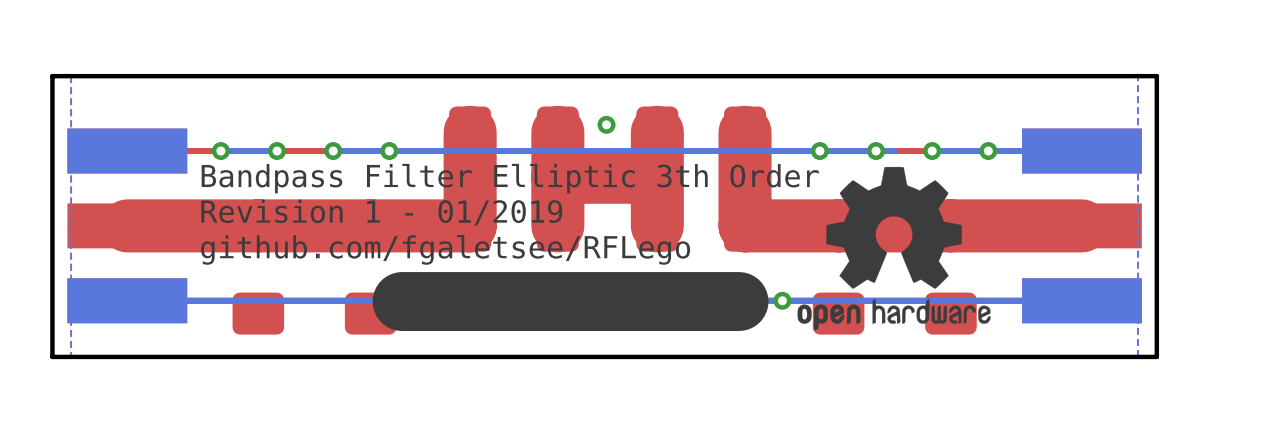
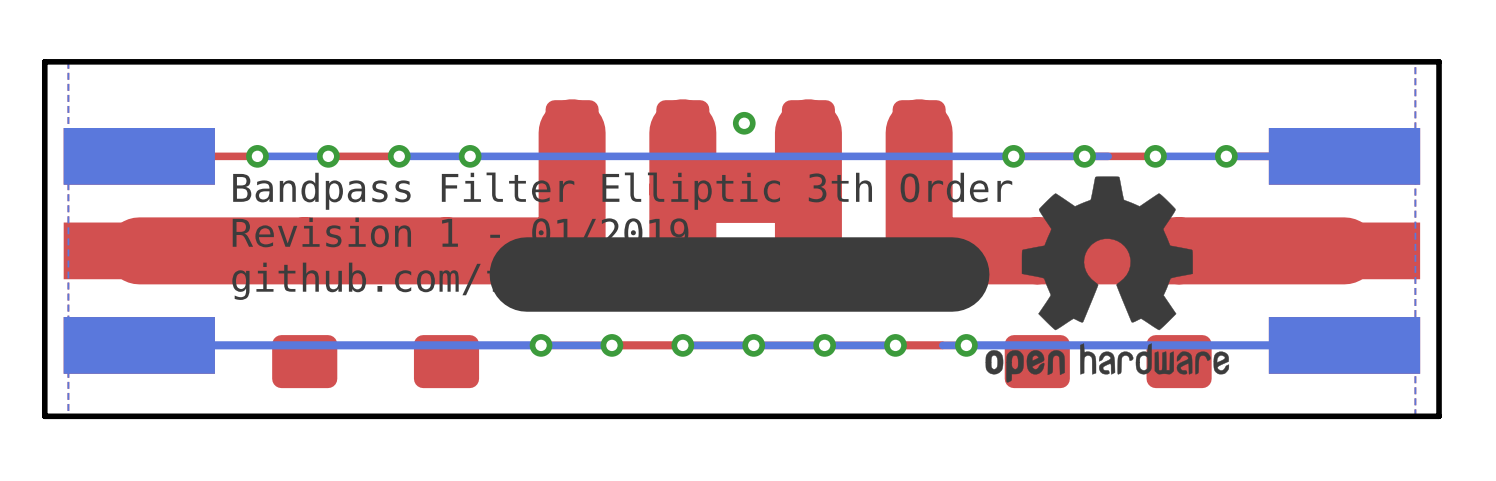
line: (739, 301) (402, 301) -> (952, 274) (526, 274)

